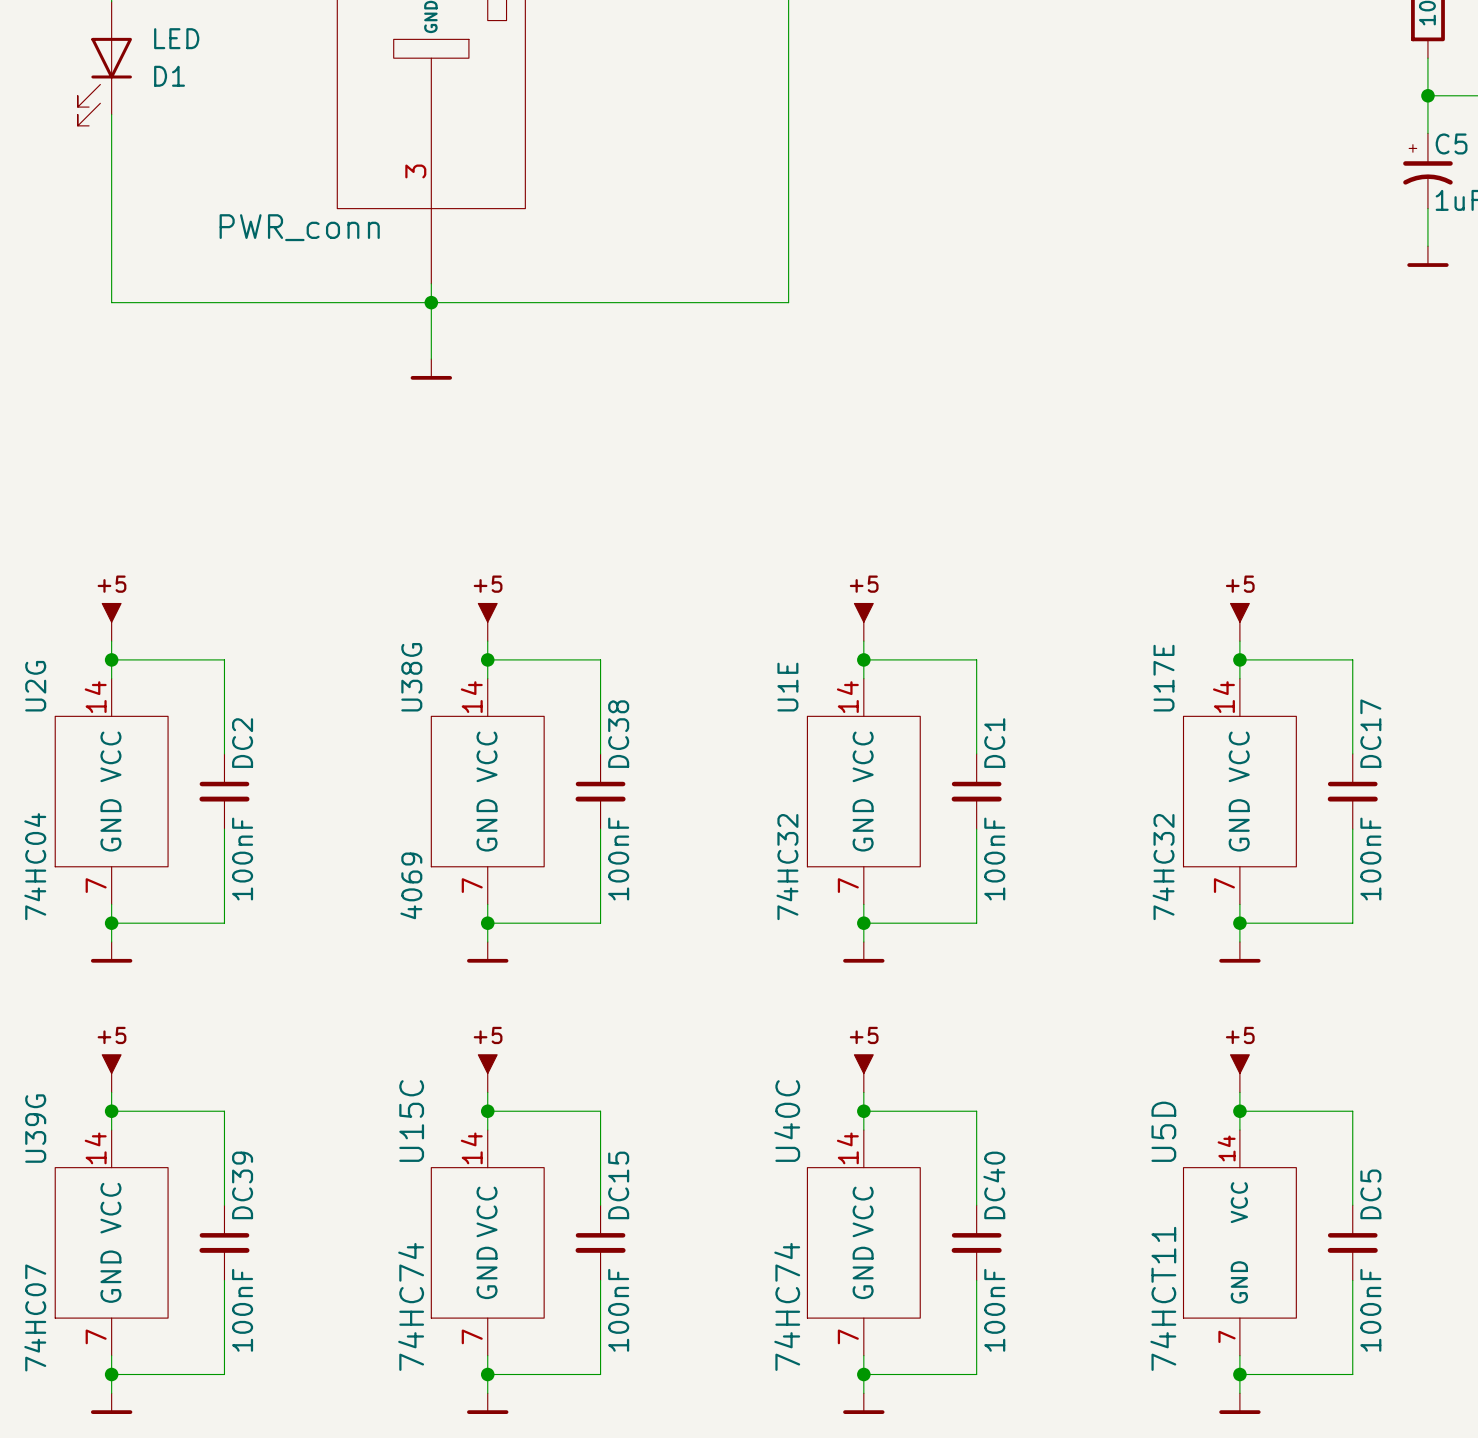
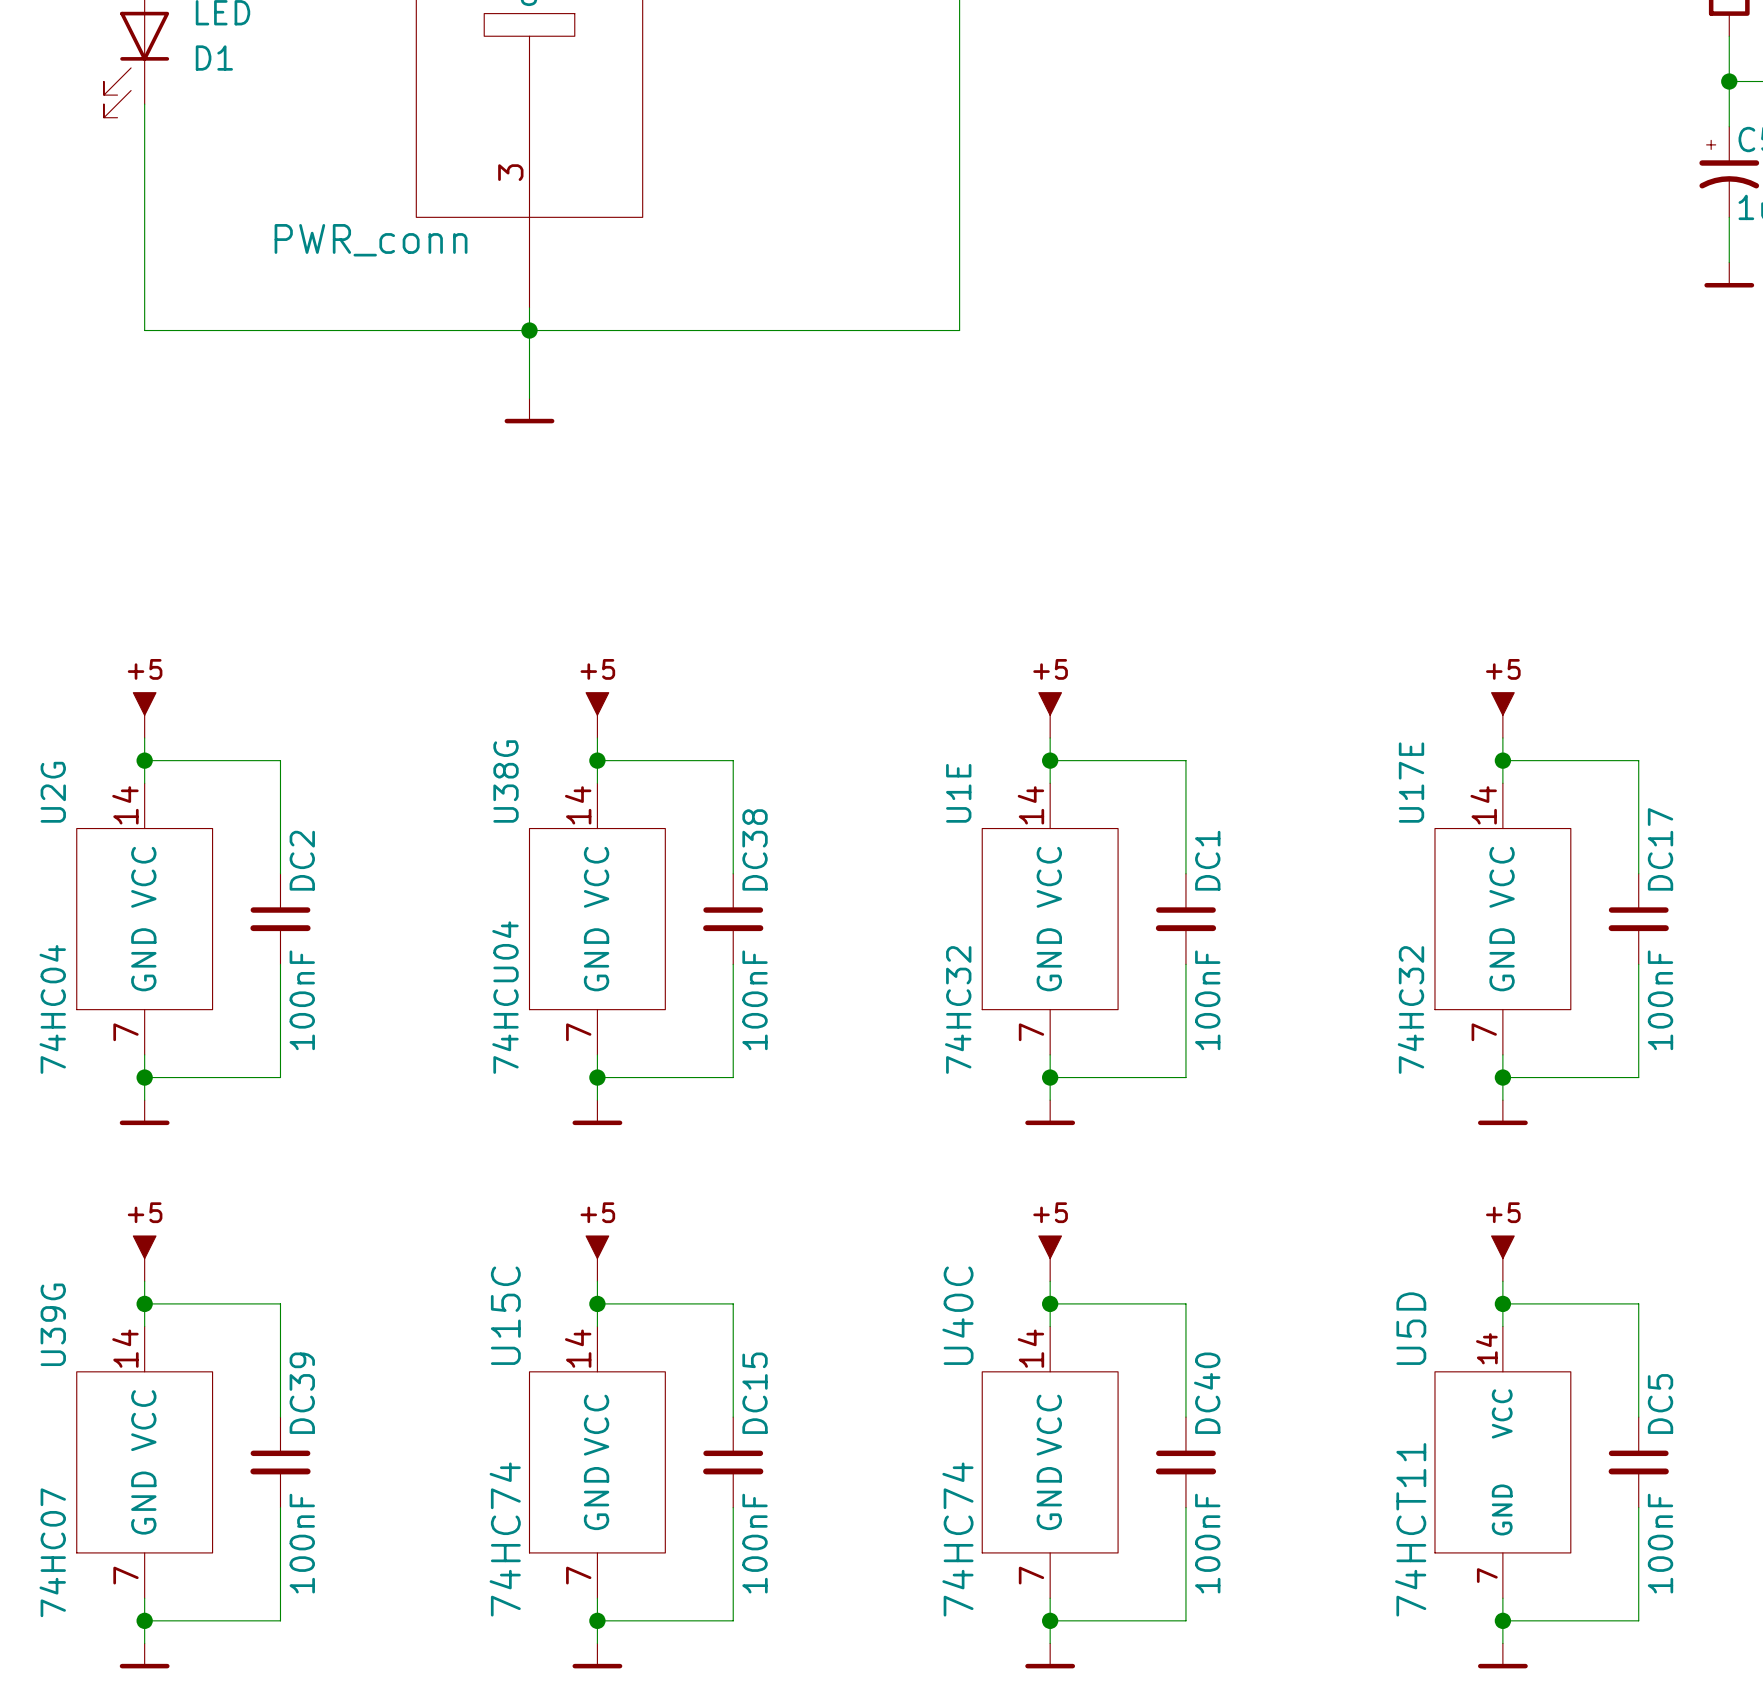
U38G value: 4069 (411, 885) -> 74HCU04 (505, 997)

